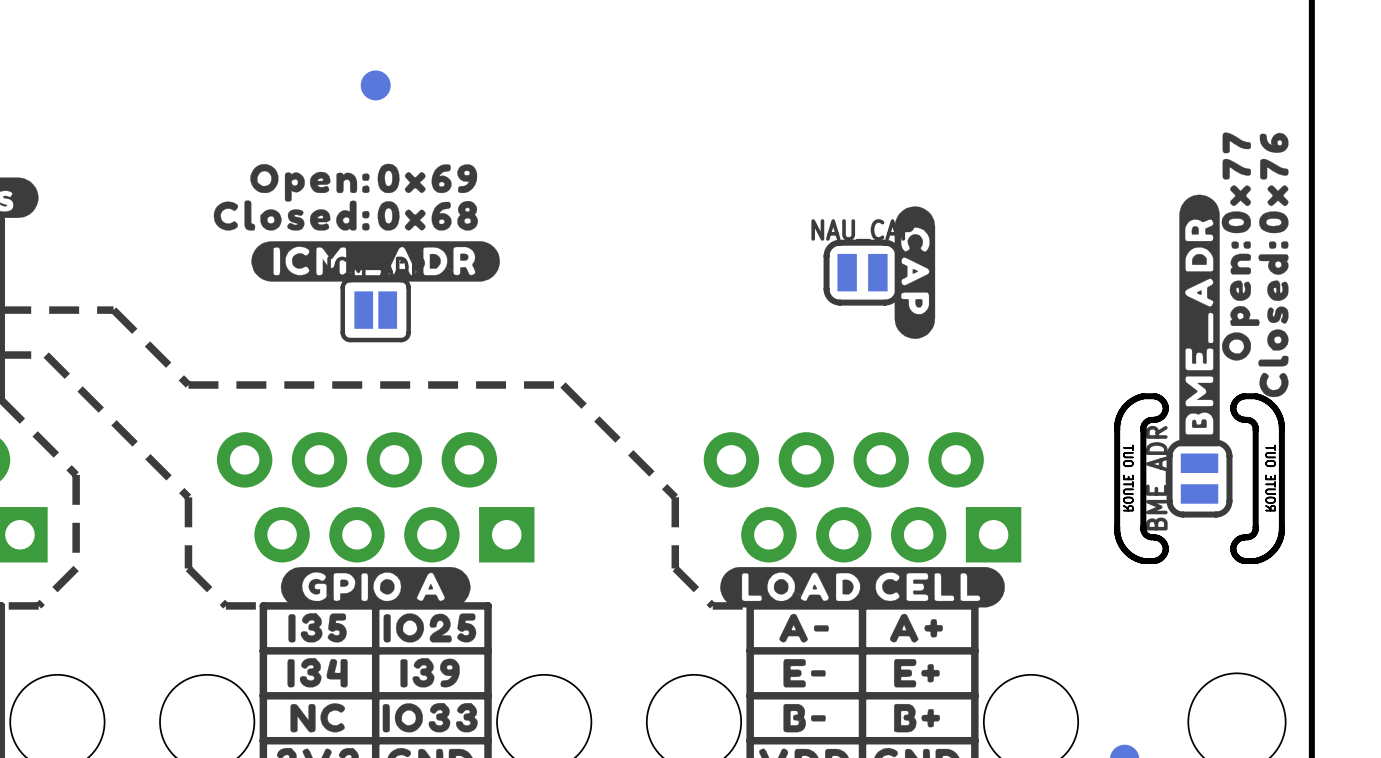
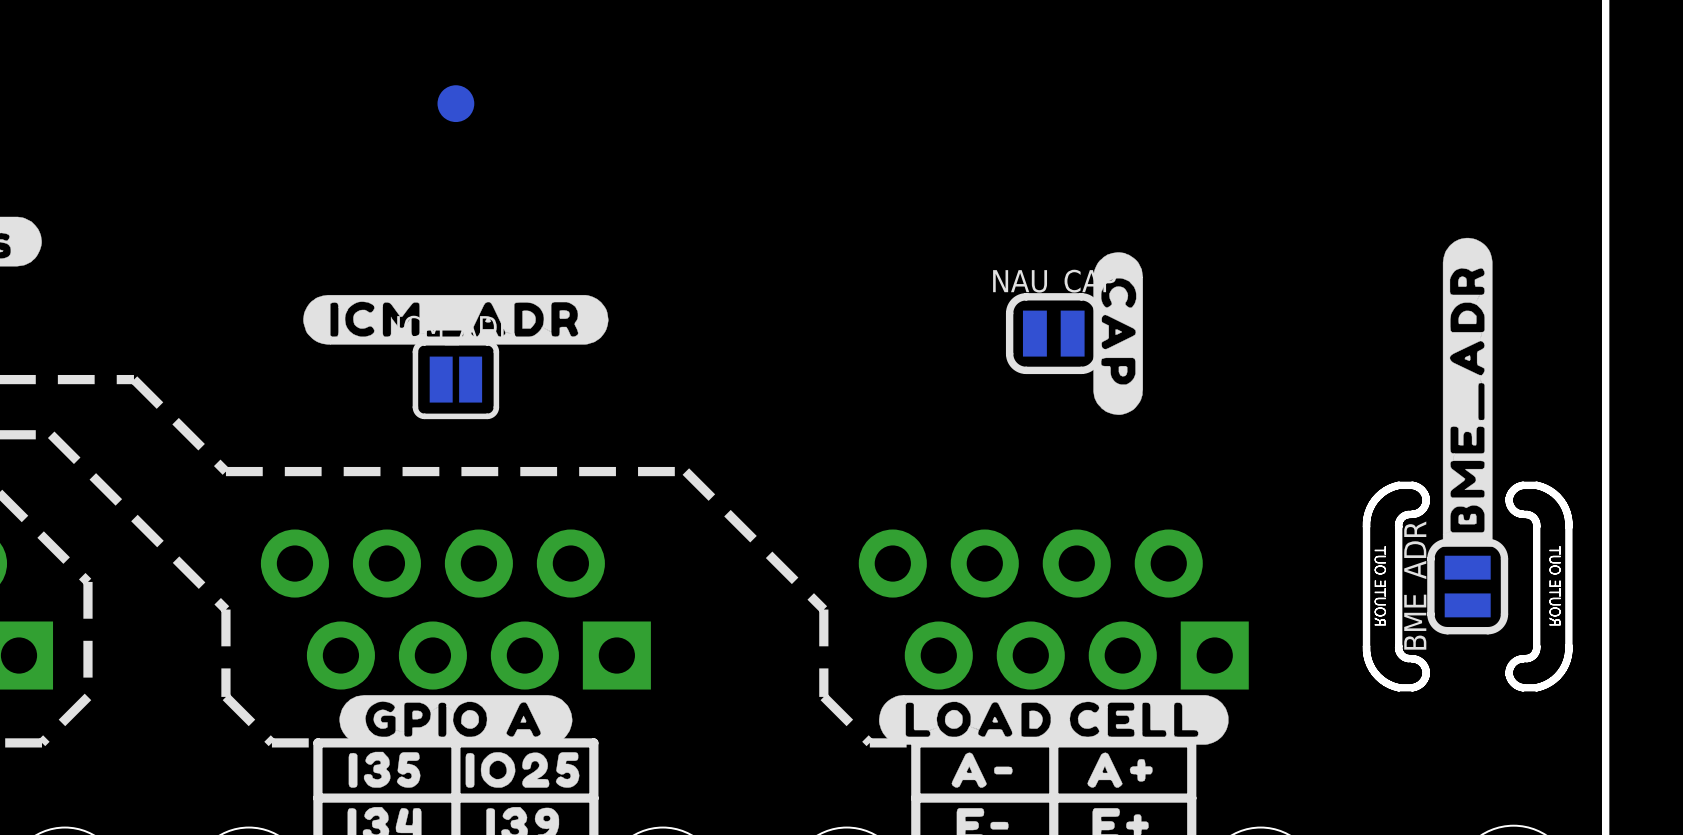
drawing: [1221, 132, 1289, 398] -> none
drawing: [213, 163, 479, 231] -> none

